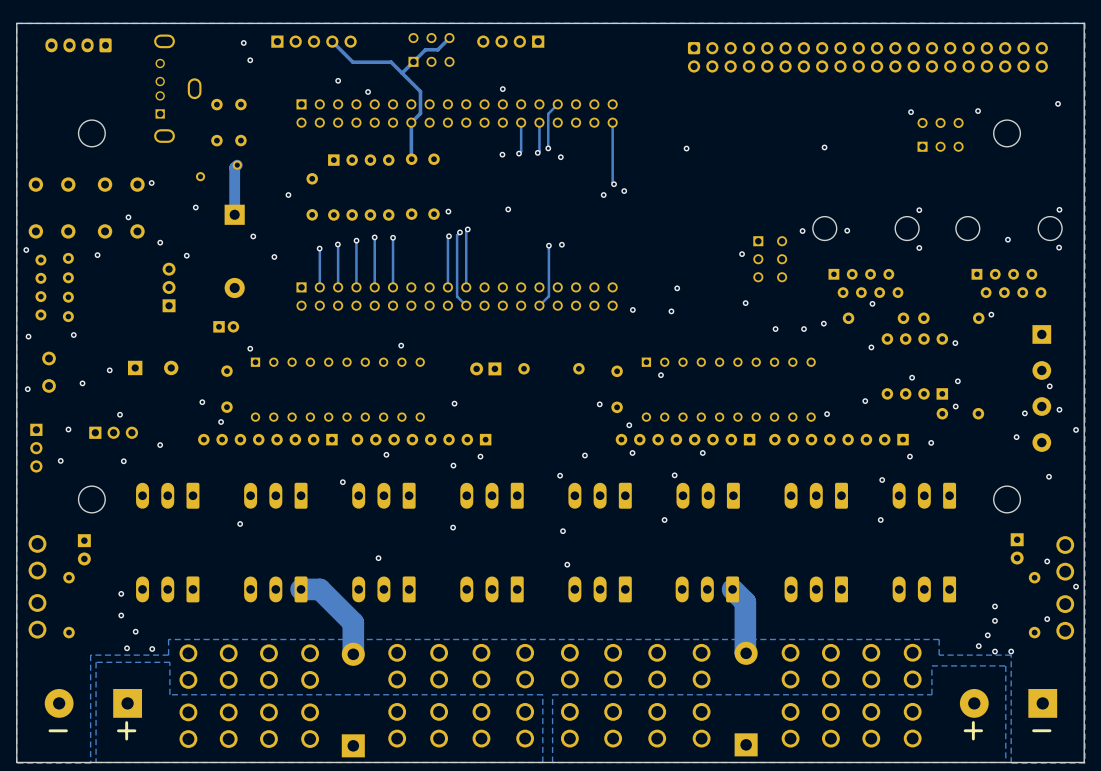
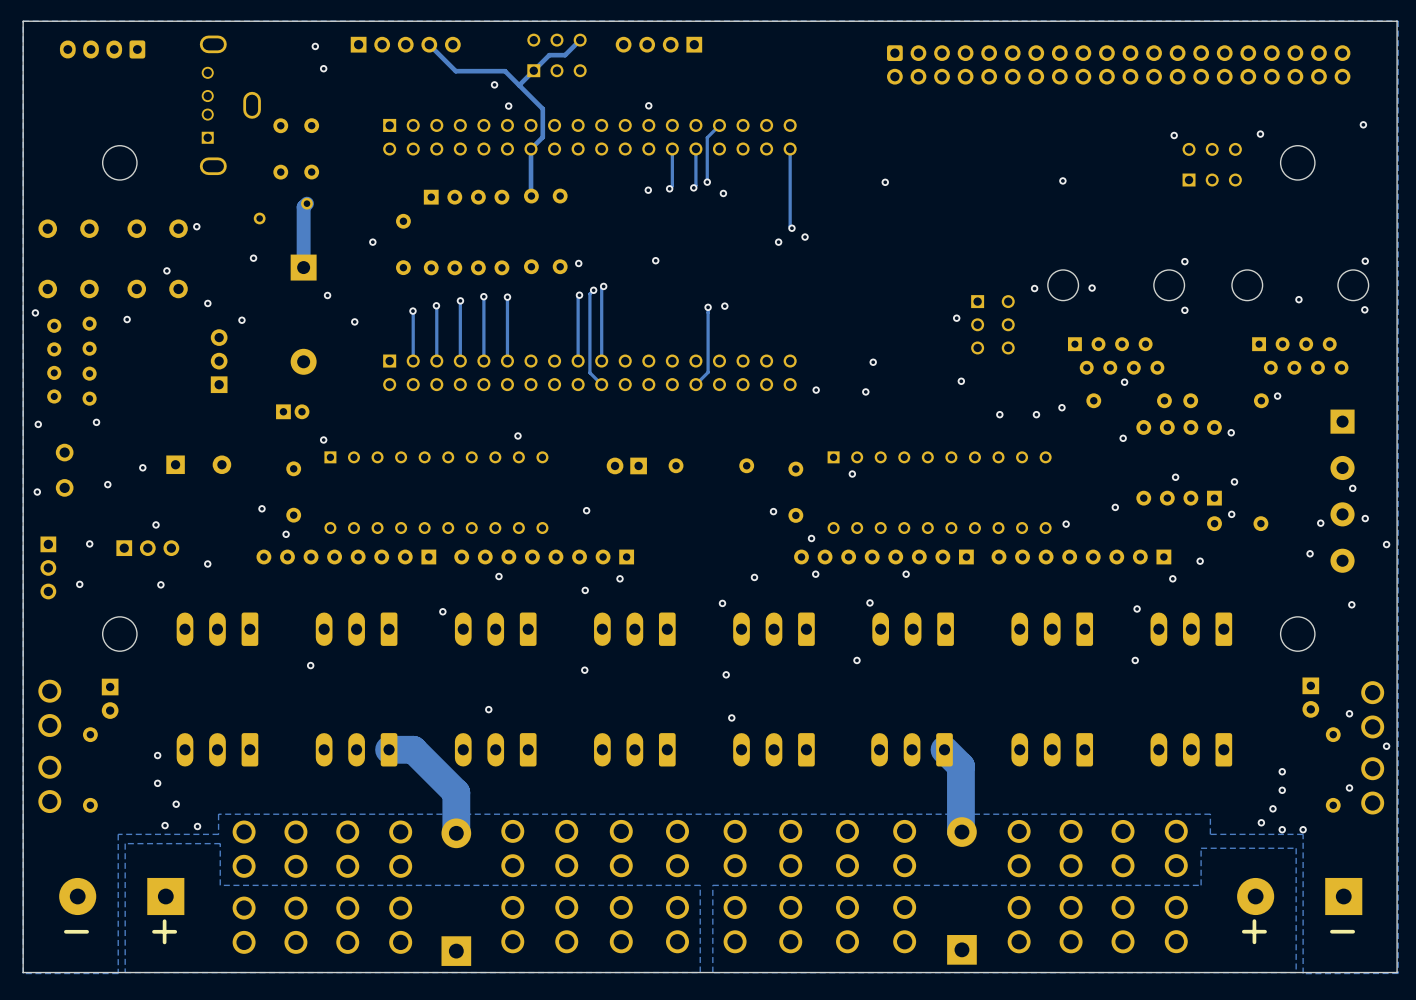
via: none -> (494, 84)
via: (338, 80) -> none
via: none -> (508, 106)
via: (368, 91) -> none

